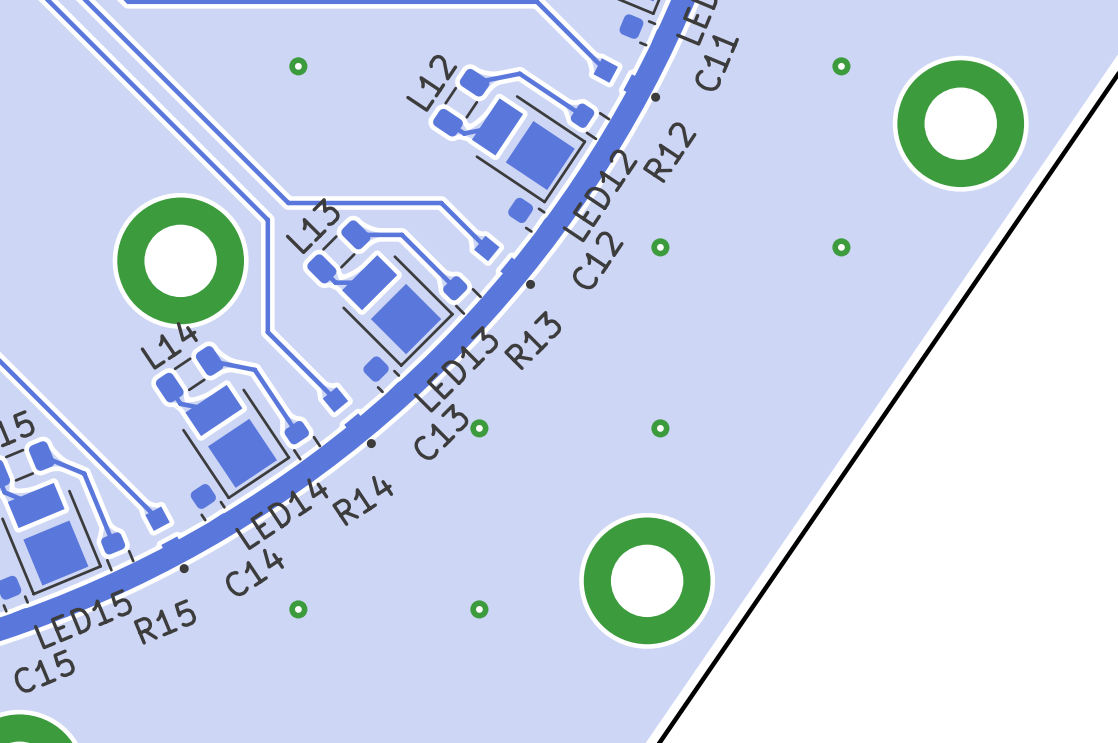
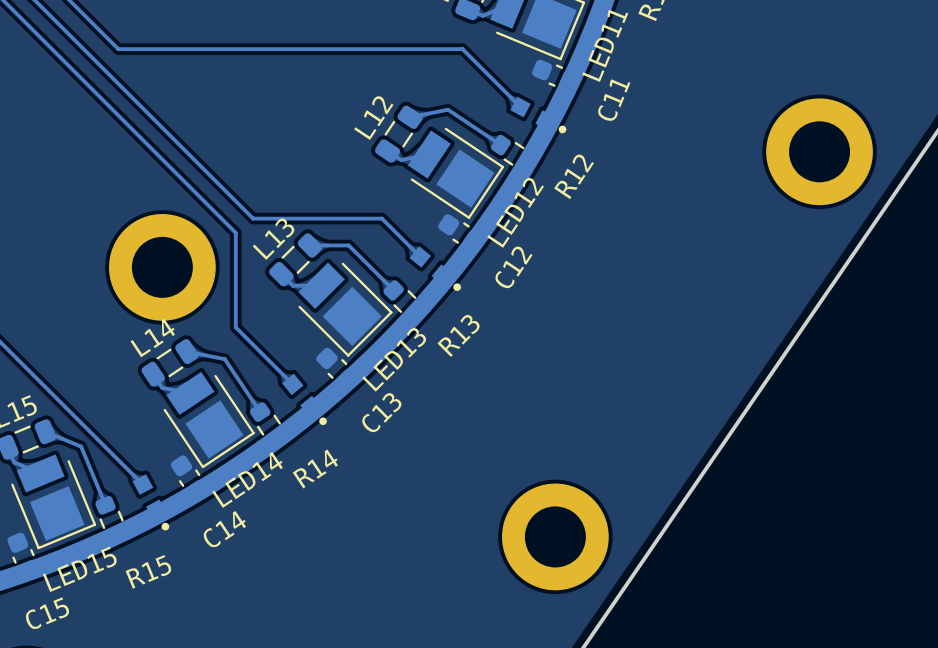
via: (298, 66) -> none
via: (841, 66) -> none
via: (660, 247) -> none
via: (841, 247) -> none
via: (479, 428) -> none
via: (660, 428) -> none
via: (298, 609) -> none
via: (479, 609) -> none

